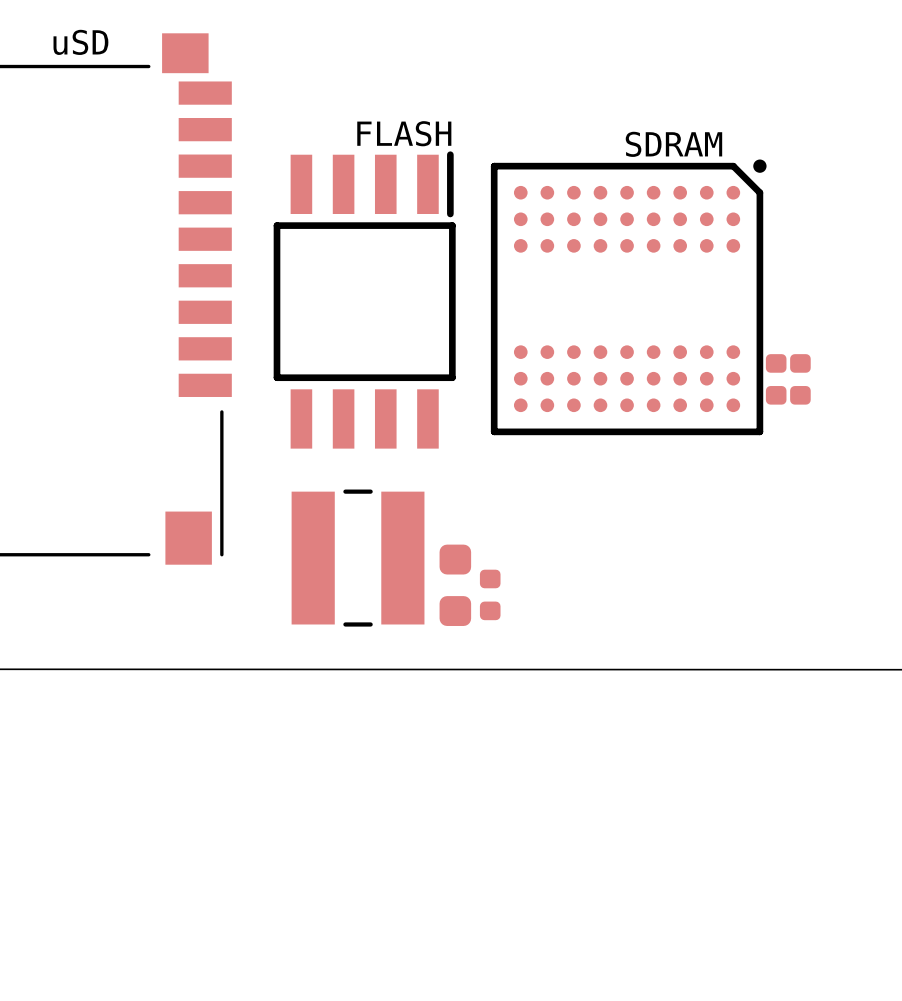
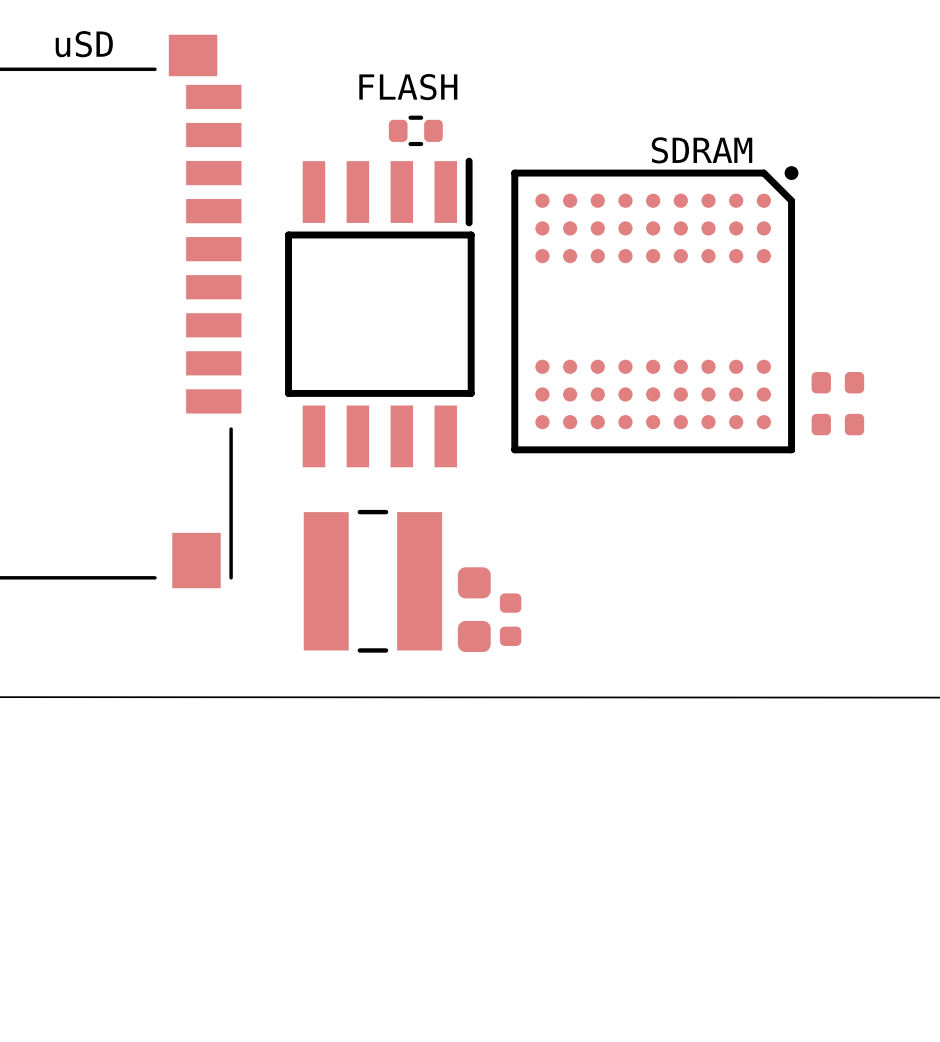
part: none -> (415, 130)
text position: FLASH (404, 133) -> FLASH (408, 87)
part rotation: 0° (776, 379) -> 90° clockwise (837, 424)
part position: (776, 379) -> (837, 424)
part rotation: 0° (800, 379) -> 90° clockwise (837, 382)

